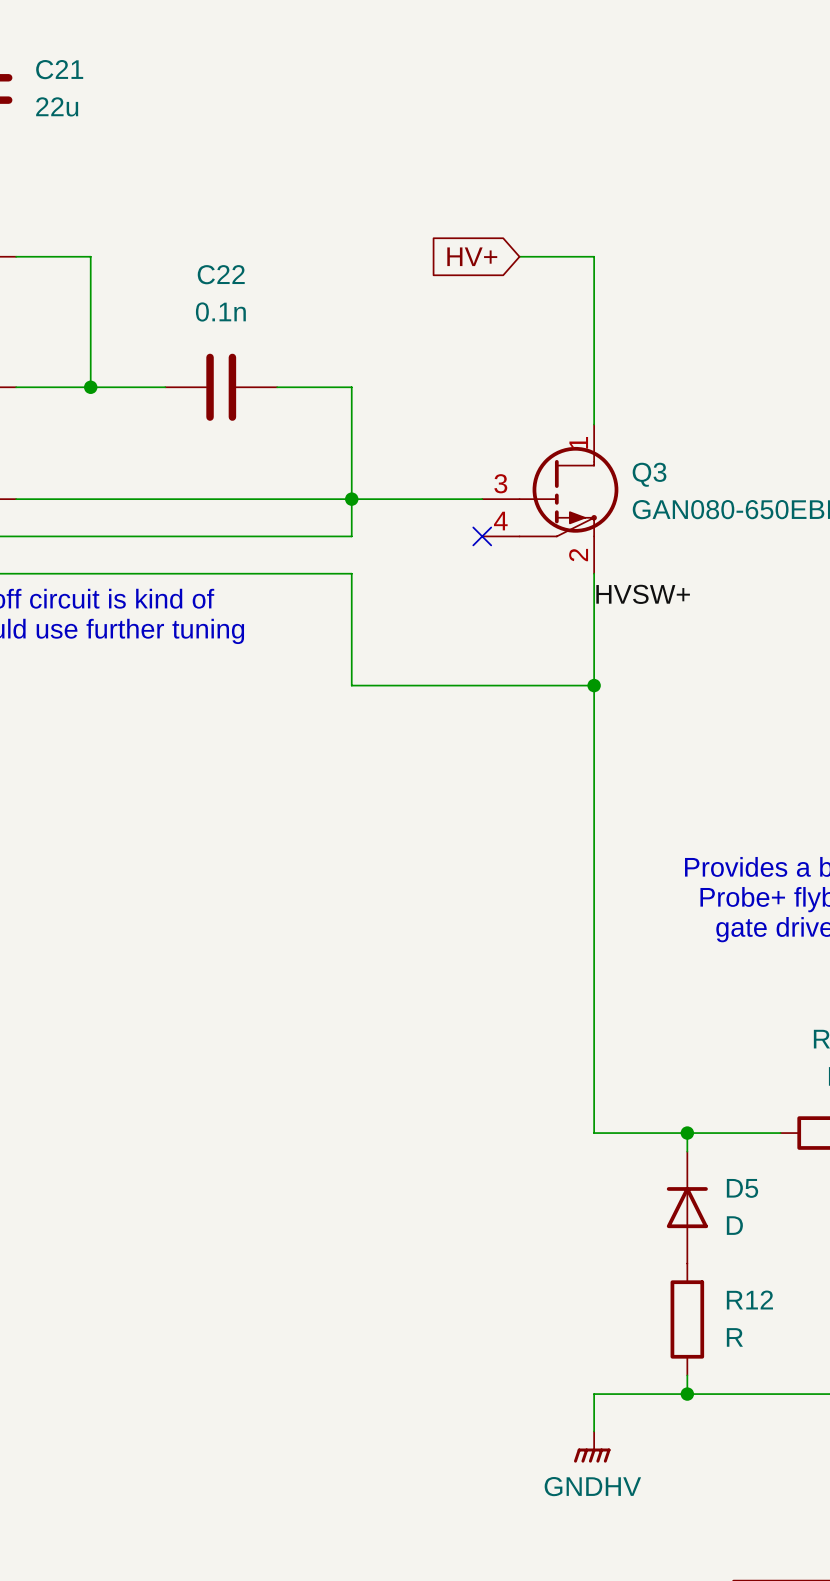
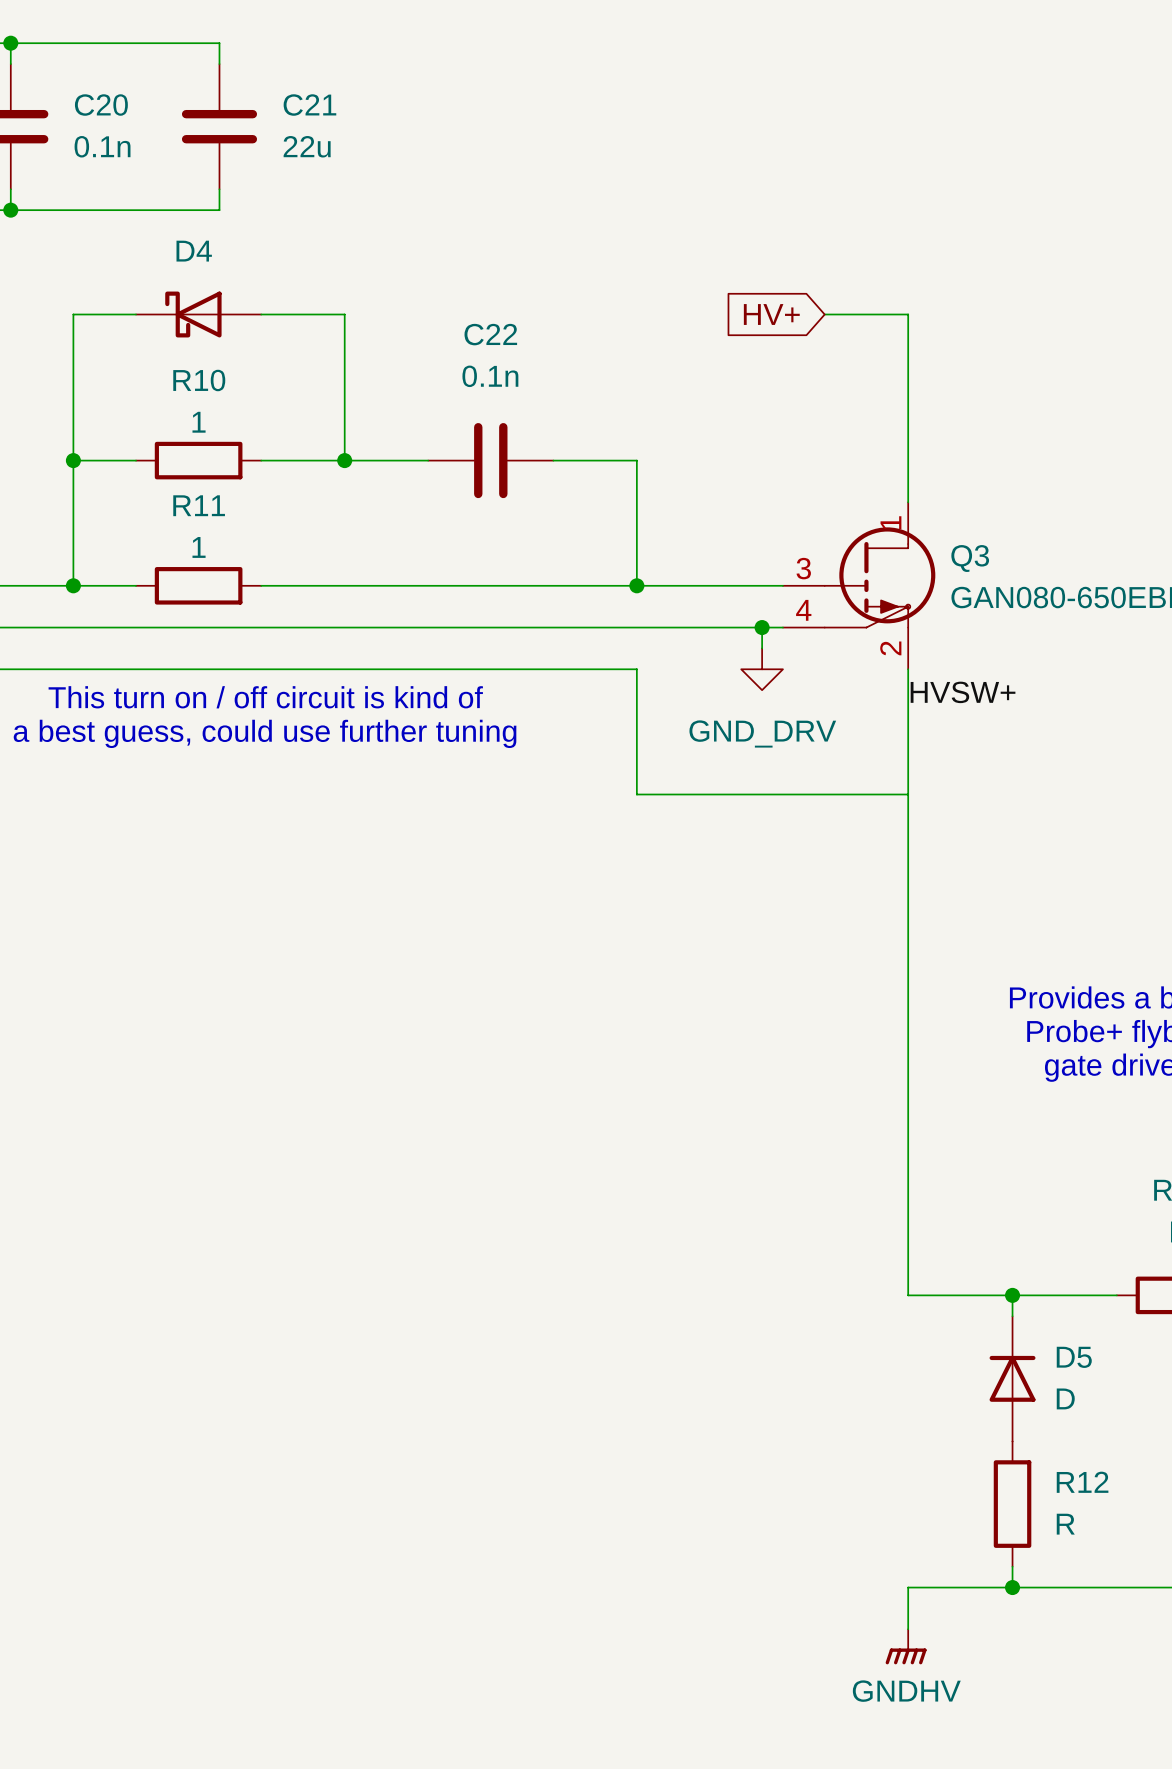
wire: (351, 499) (351, 536) -> (782, 627) (636, 627)
wire: none -> (762, 627) (762, 648)
junction: none -> (762, 627)
no-connect mark: (482, 536) -> none
power symbol: none -> GND_DRV (762, 669)
junction: (594, 685) -> none

